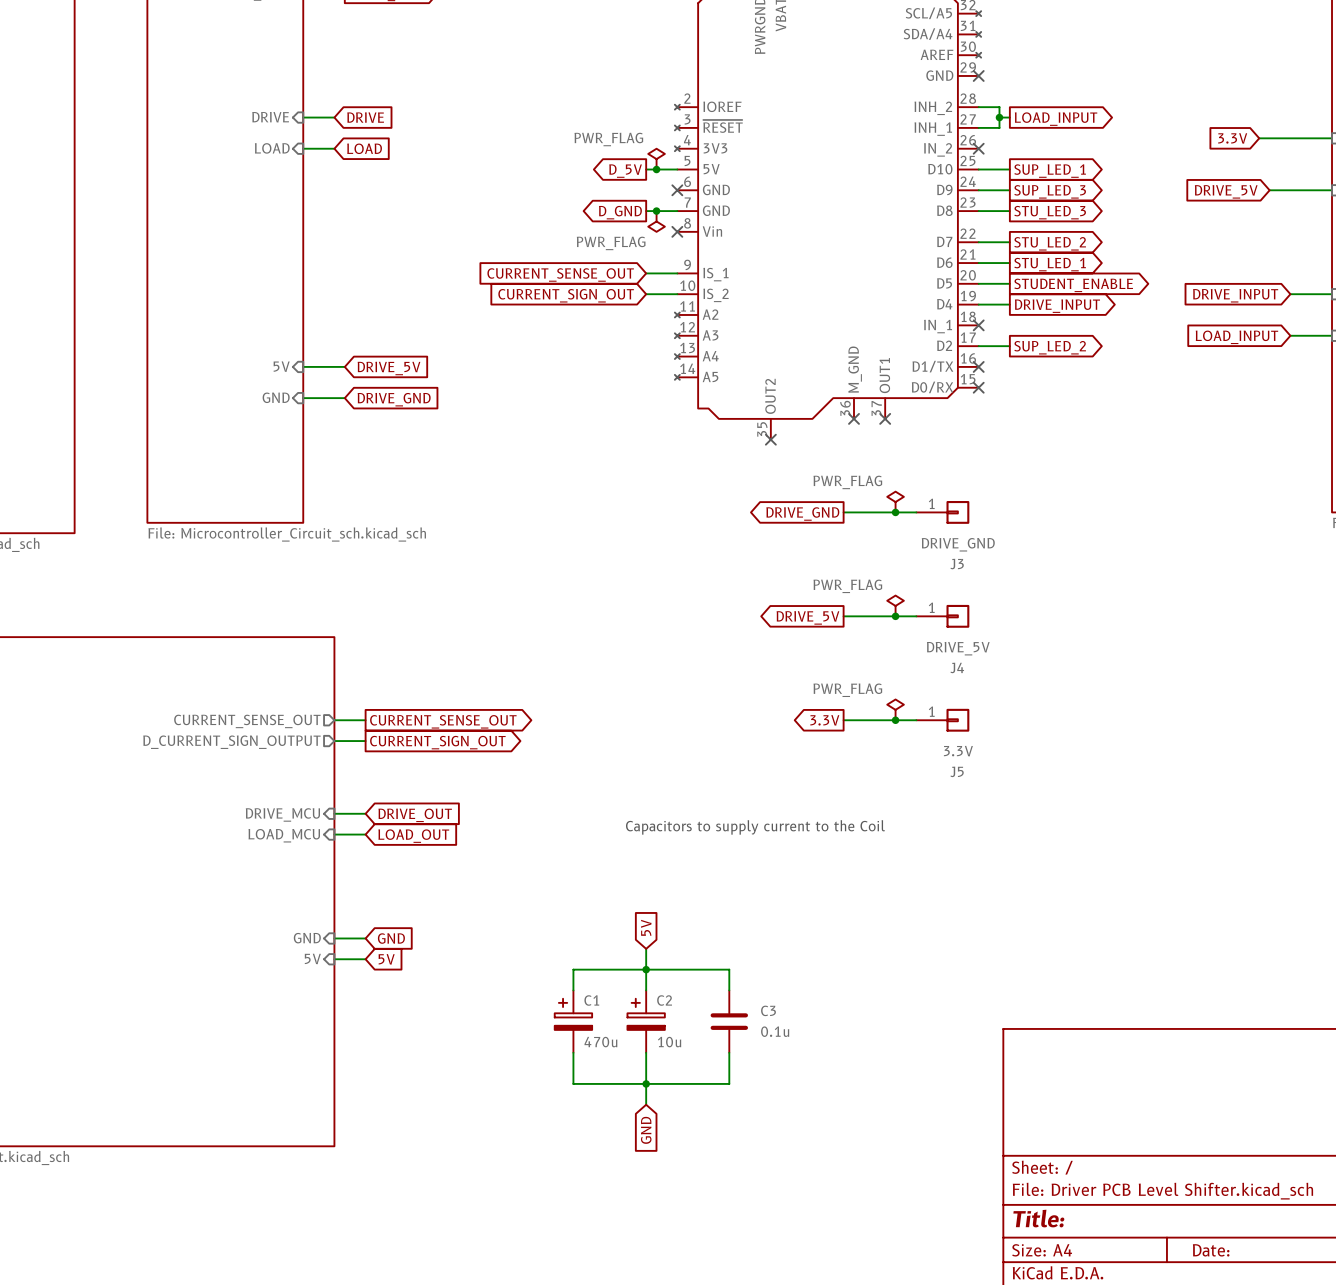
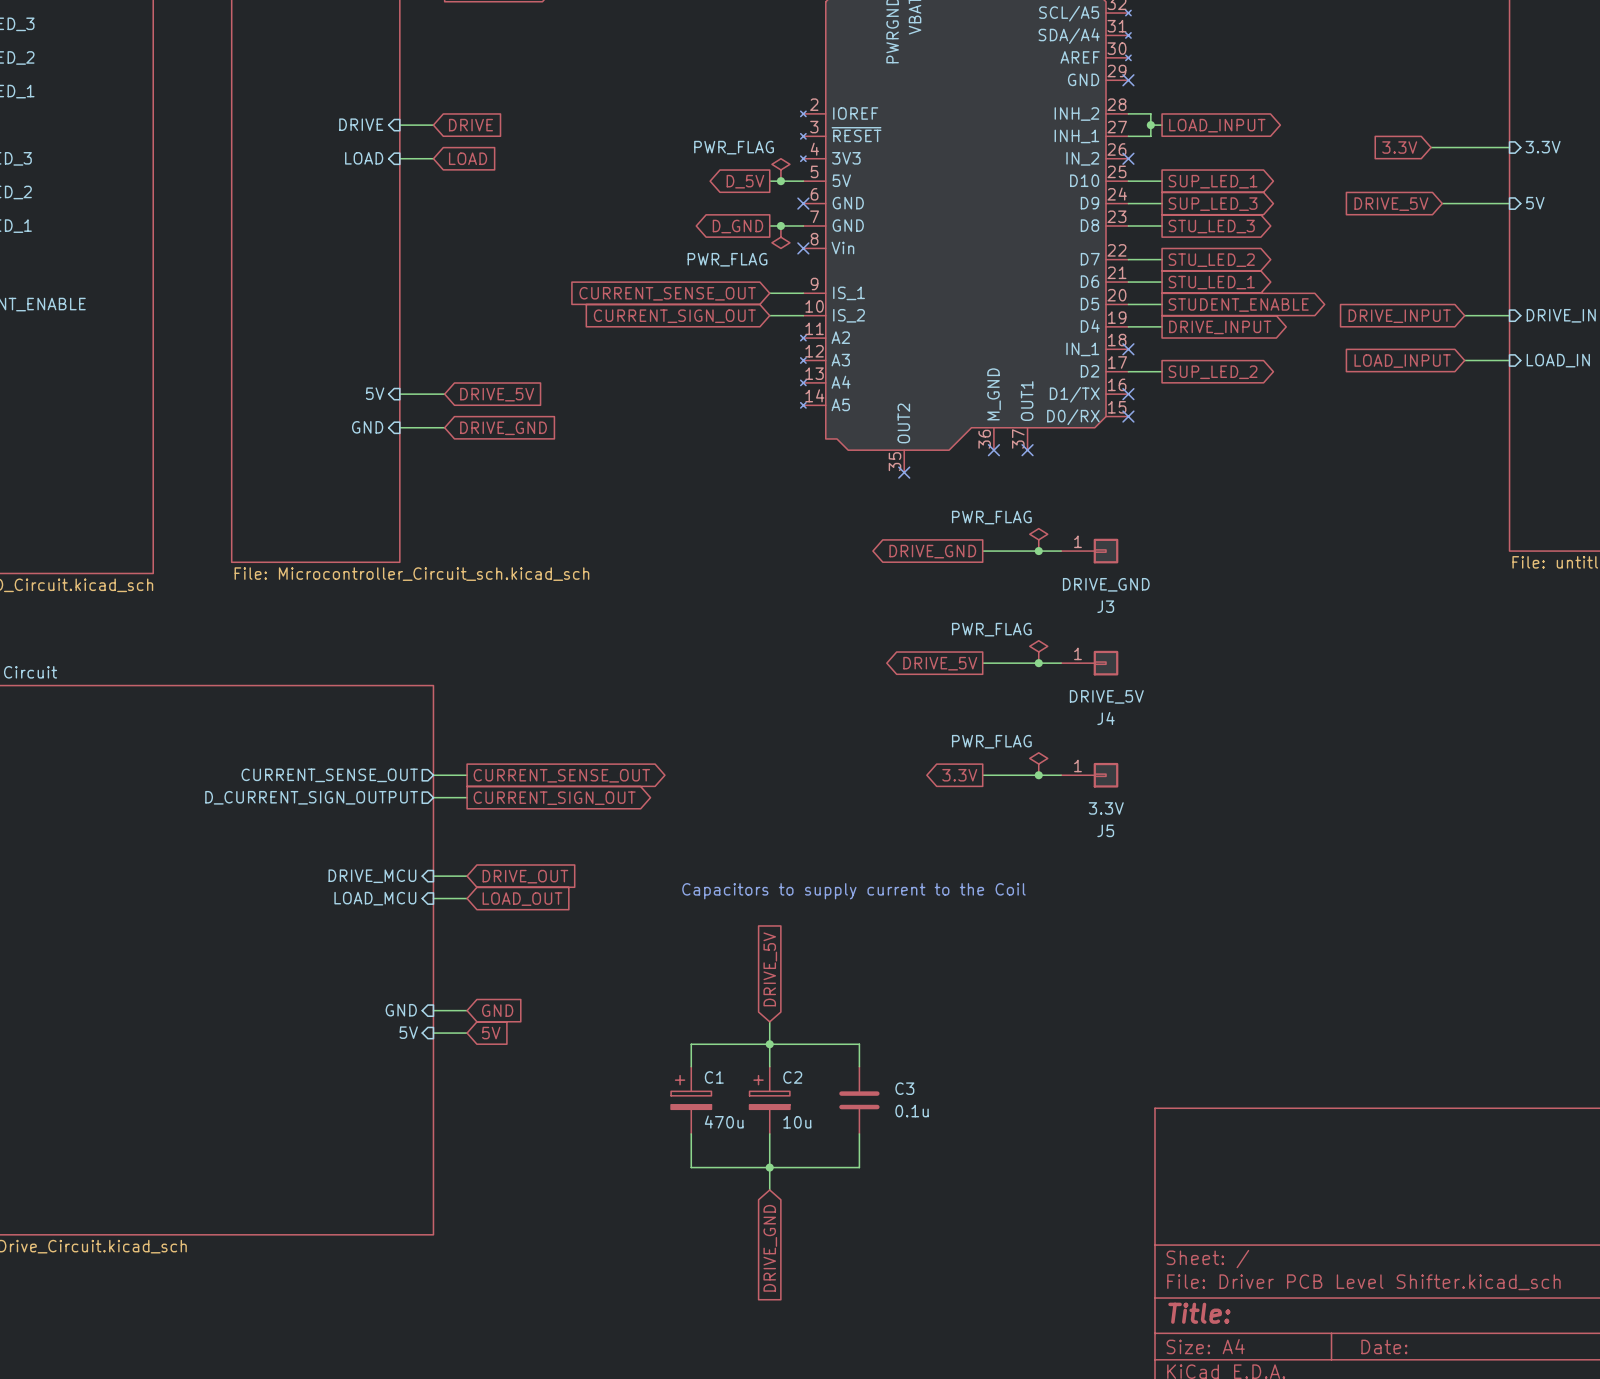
global label: 5V (646, 927) -> DRIVE_5V (770, 969)
global label: GND (646, 1130) -> DRIVE_GND (770, 1248)

